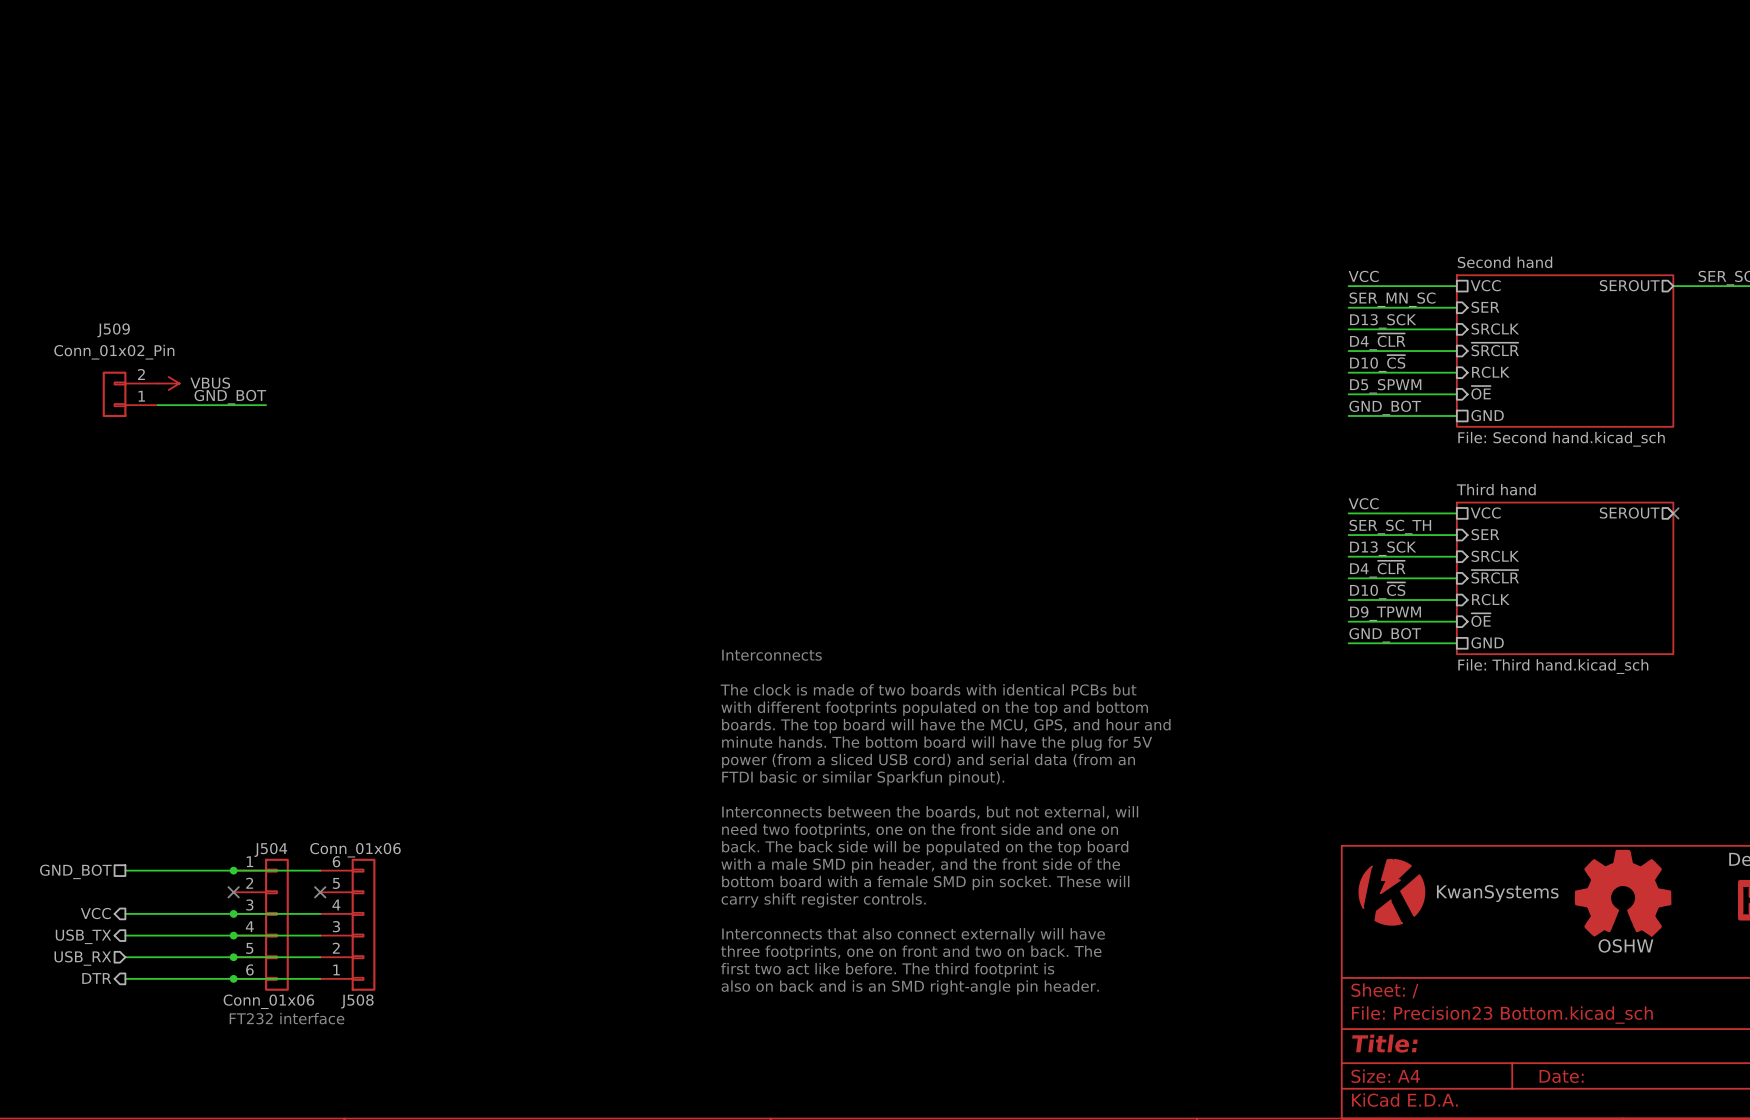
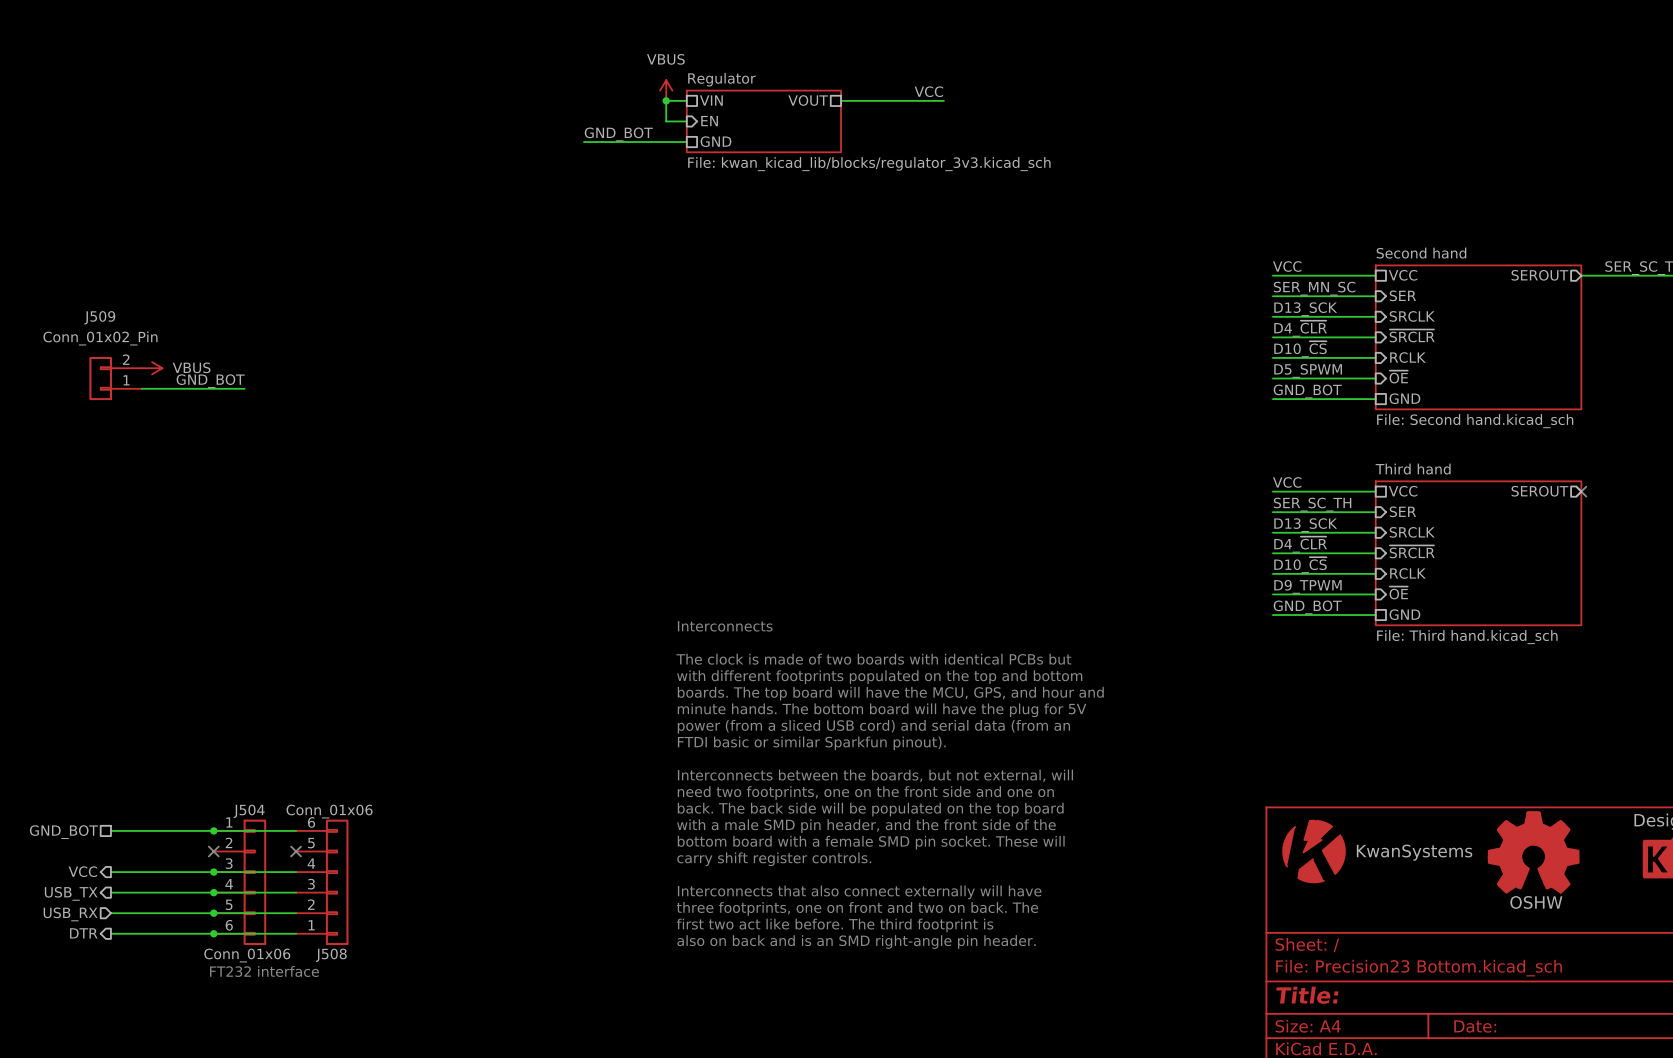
power symbol: none -> VBUS (666, 90)
label: none -> VCC (928, 91)
sheet pin: none -> VIN (711, 100)
sheet pin: none -> VOUT (808, 100)
junction: none -> (666, 100)
wire: none -> (686, 100) (666, 100) (666, 121) (686, 121)
wire: none -> (841, 100) (943, 100)
sheet pin: none -> EN (709, 121)
sheet Regulator: none -> File: kwan_kicad_lib/blocks/regulator_3v3.kicad_sch (763, 121)
label: none -> GND_BOT (618, 134)
sheet pin: none -> GND (716, 141)
wire: none -> (583, 142) (686, 142)

